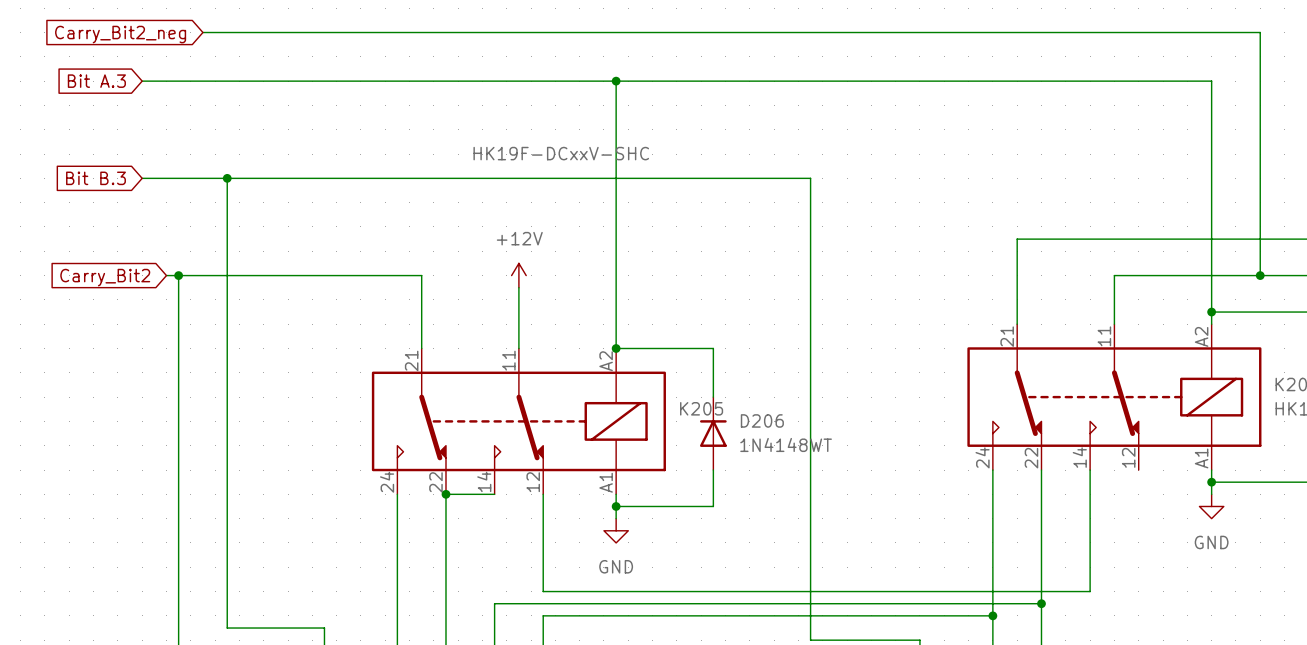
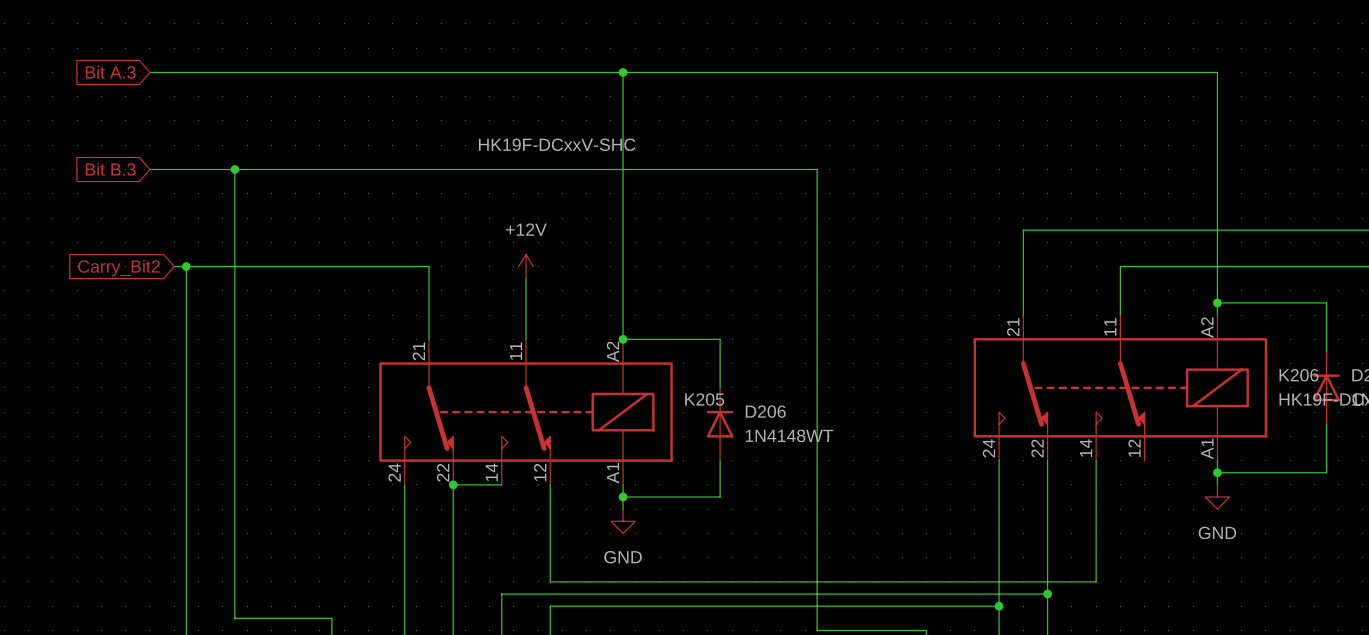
wire: (202, 32) (1260, 32) (1260, 275) -> none
global label: Carry_Bit2_neg (120, 34) -> none
junction: (1260, 275) -> none

